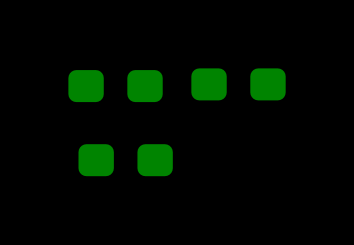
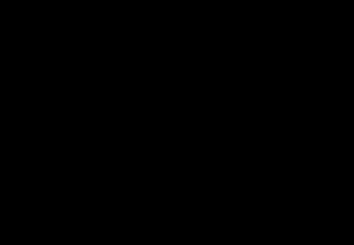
part: (238, 84) -> none
part: (115, 86) -> none
part: (125, 160) -> none

